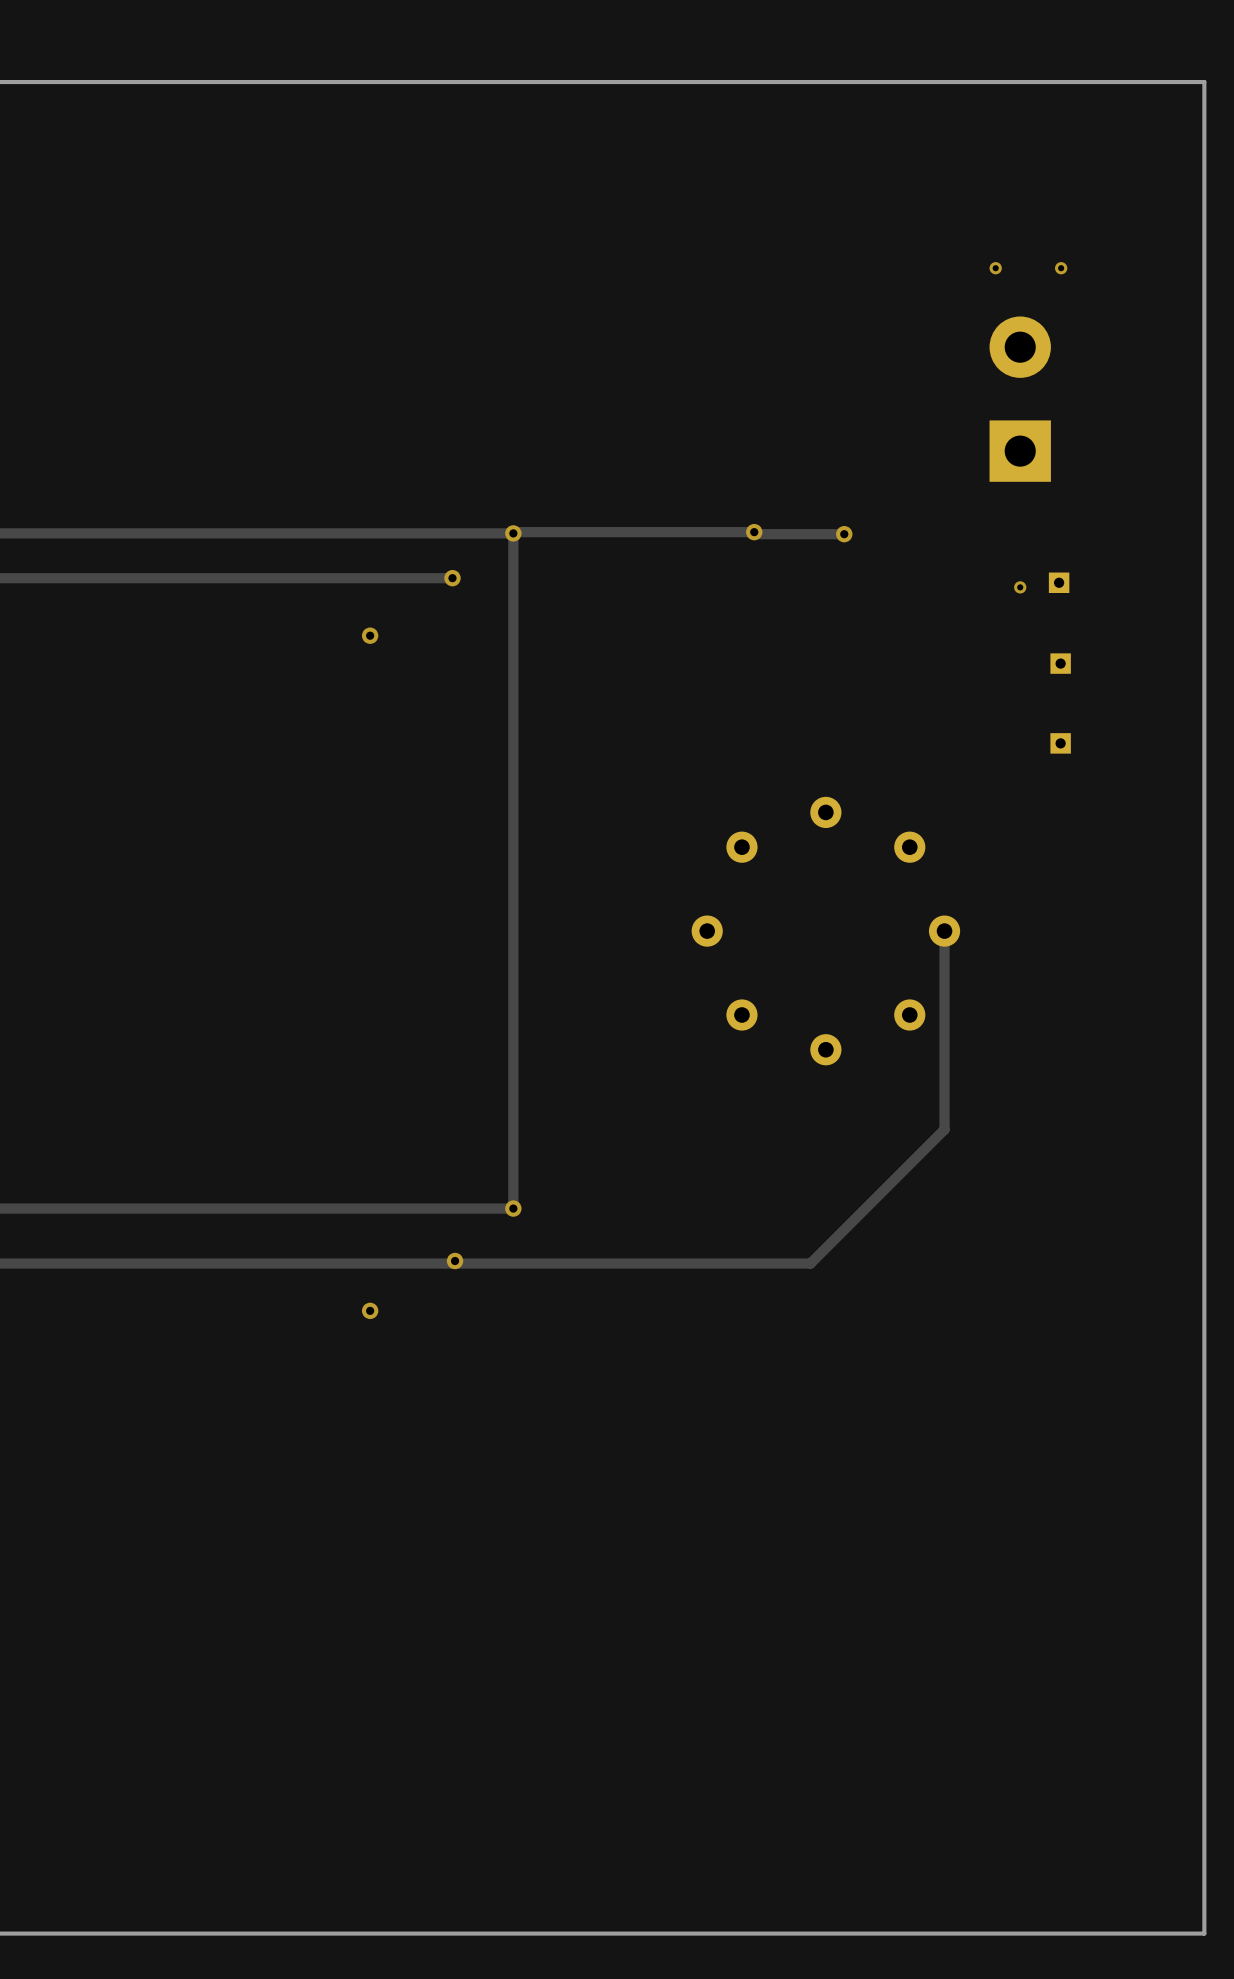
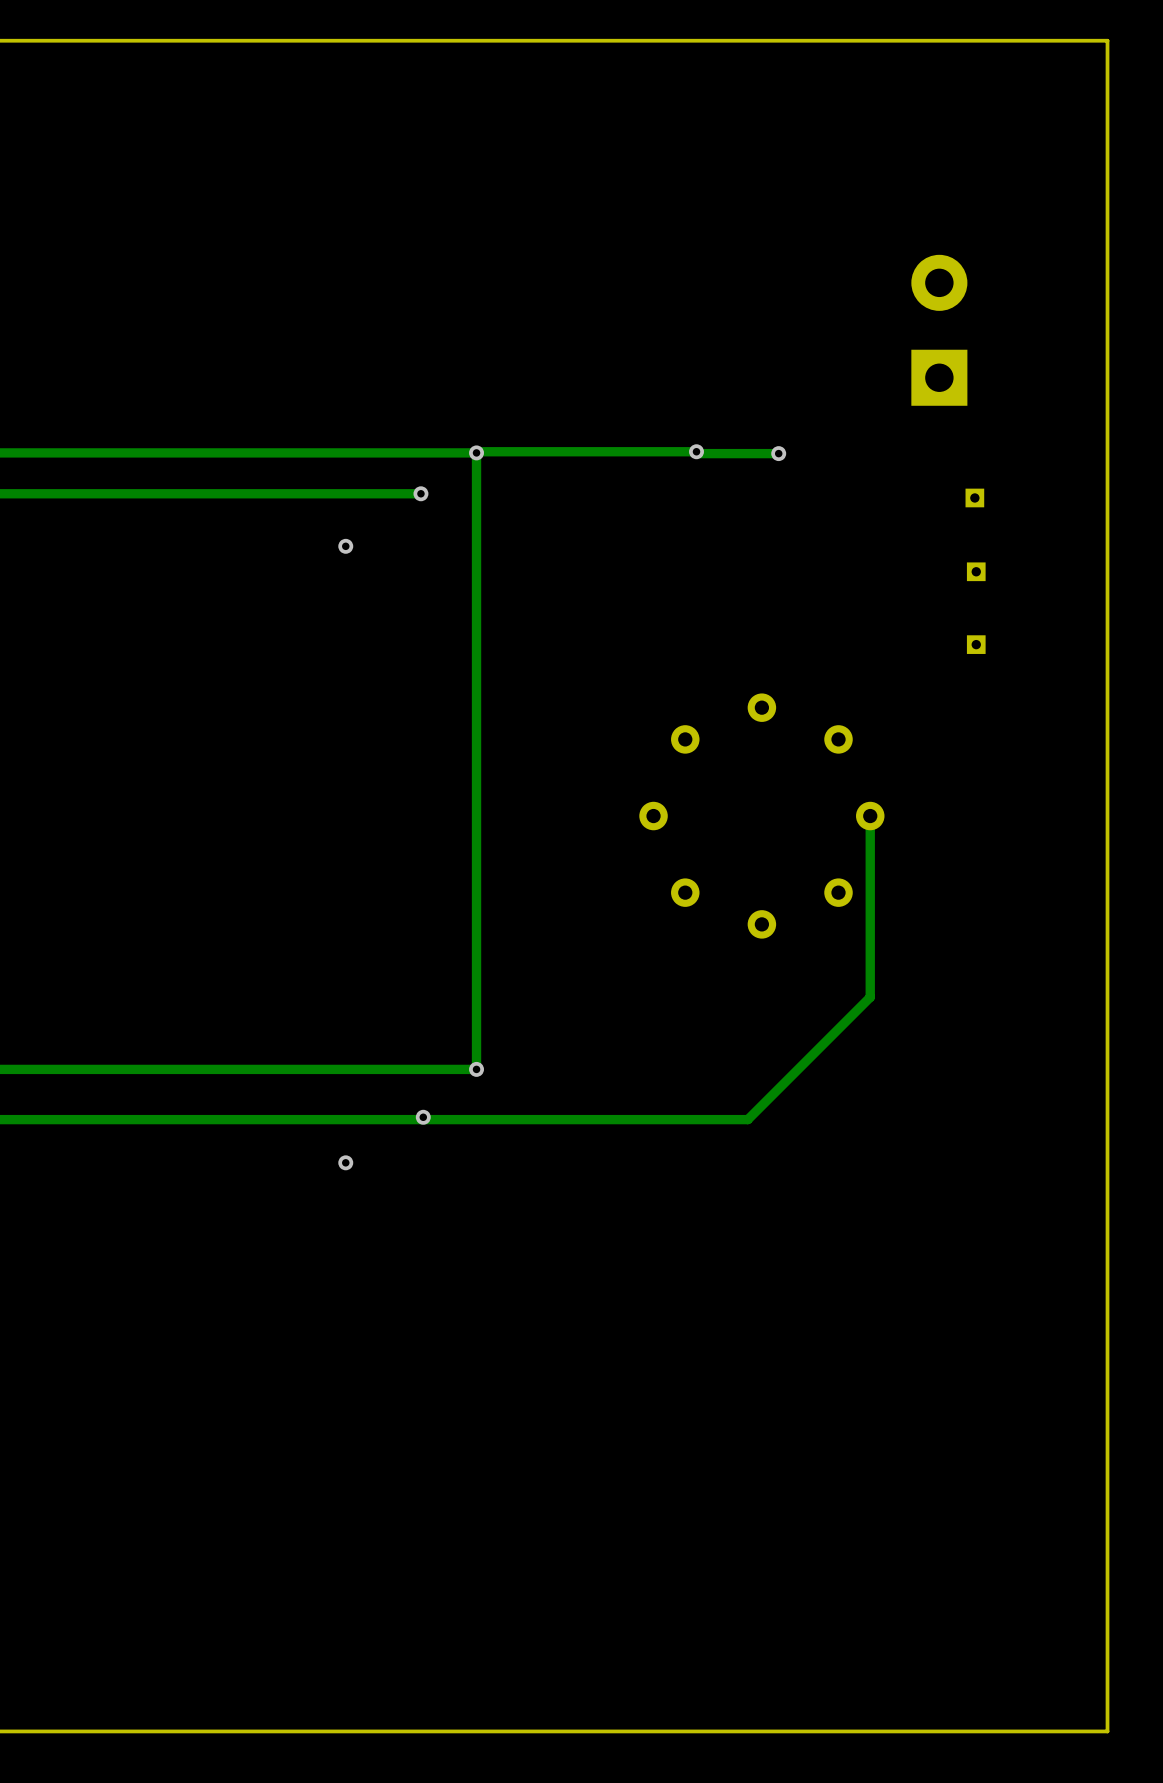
via: (995, 268) -> none
via: (1061, 268) -> none
via: (1020, 587) -> none

